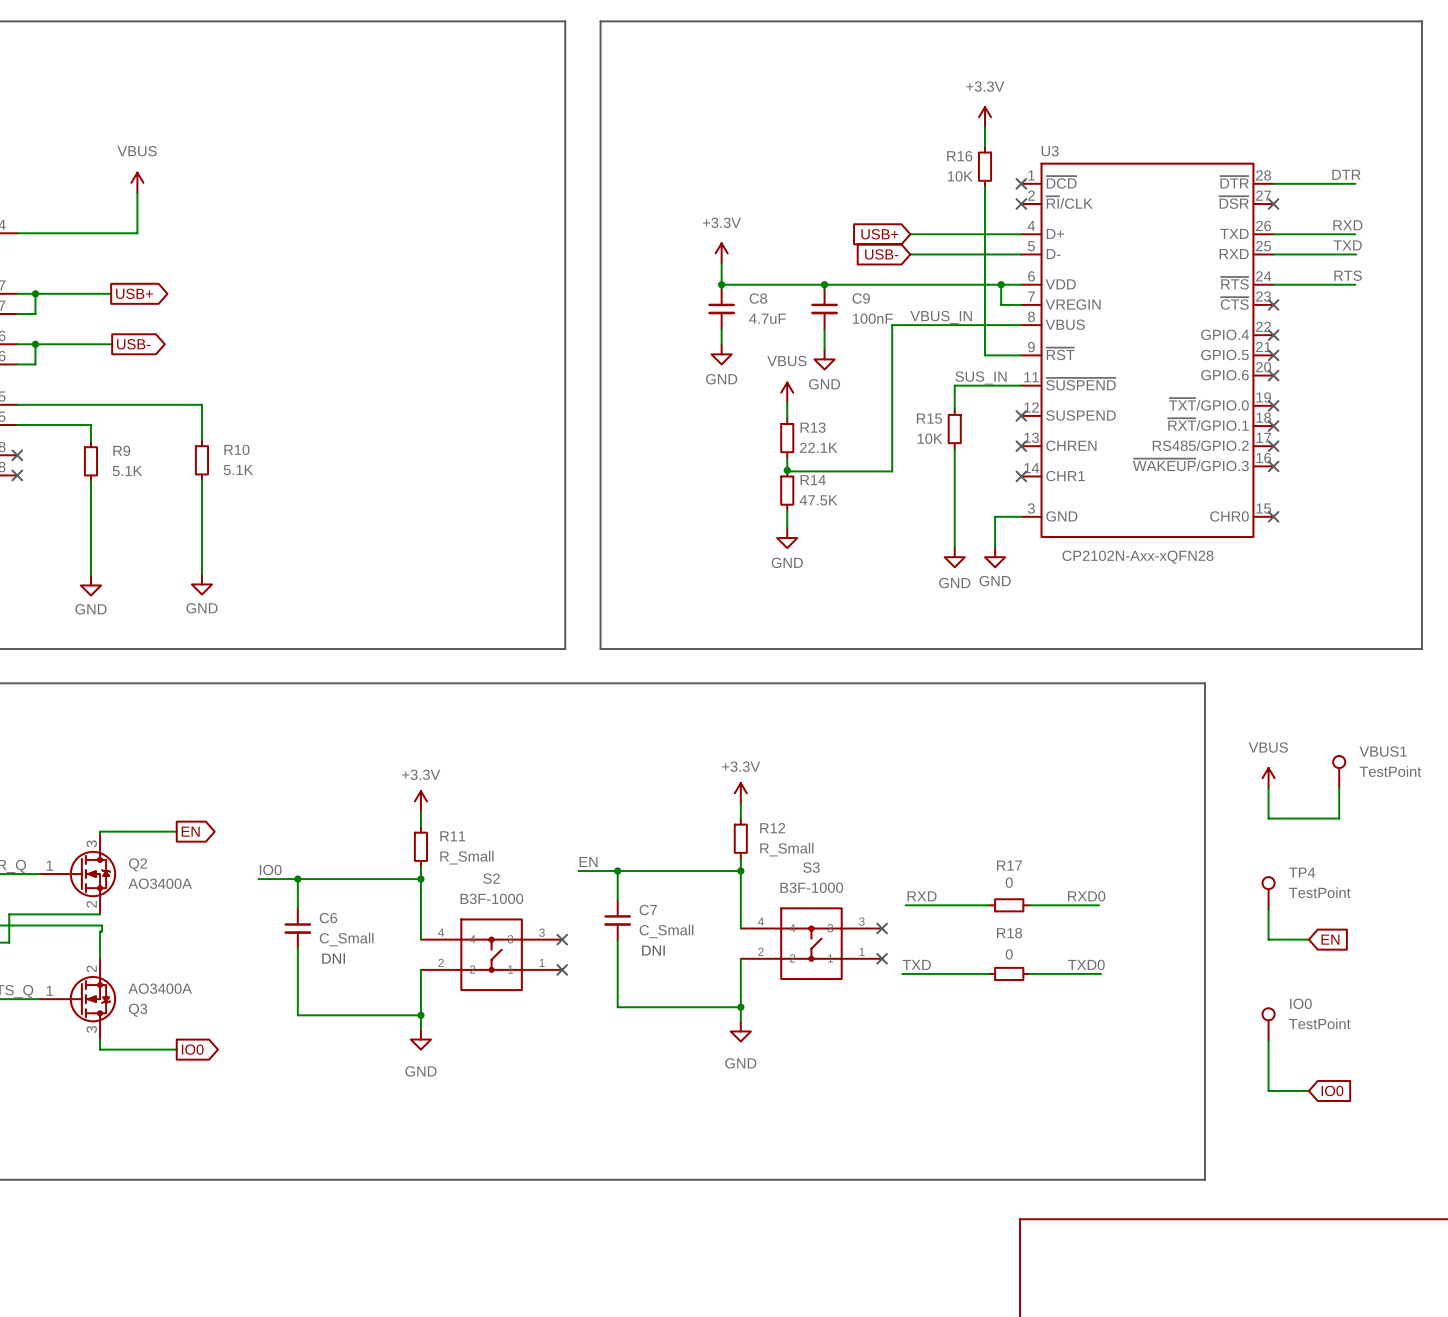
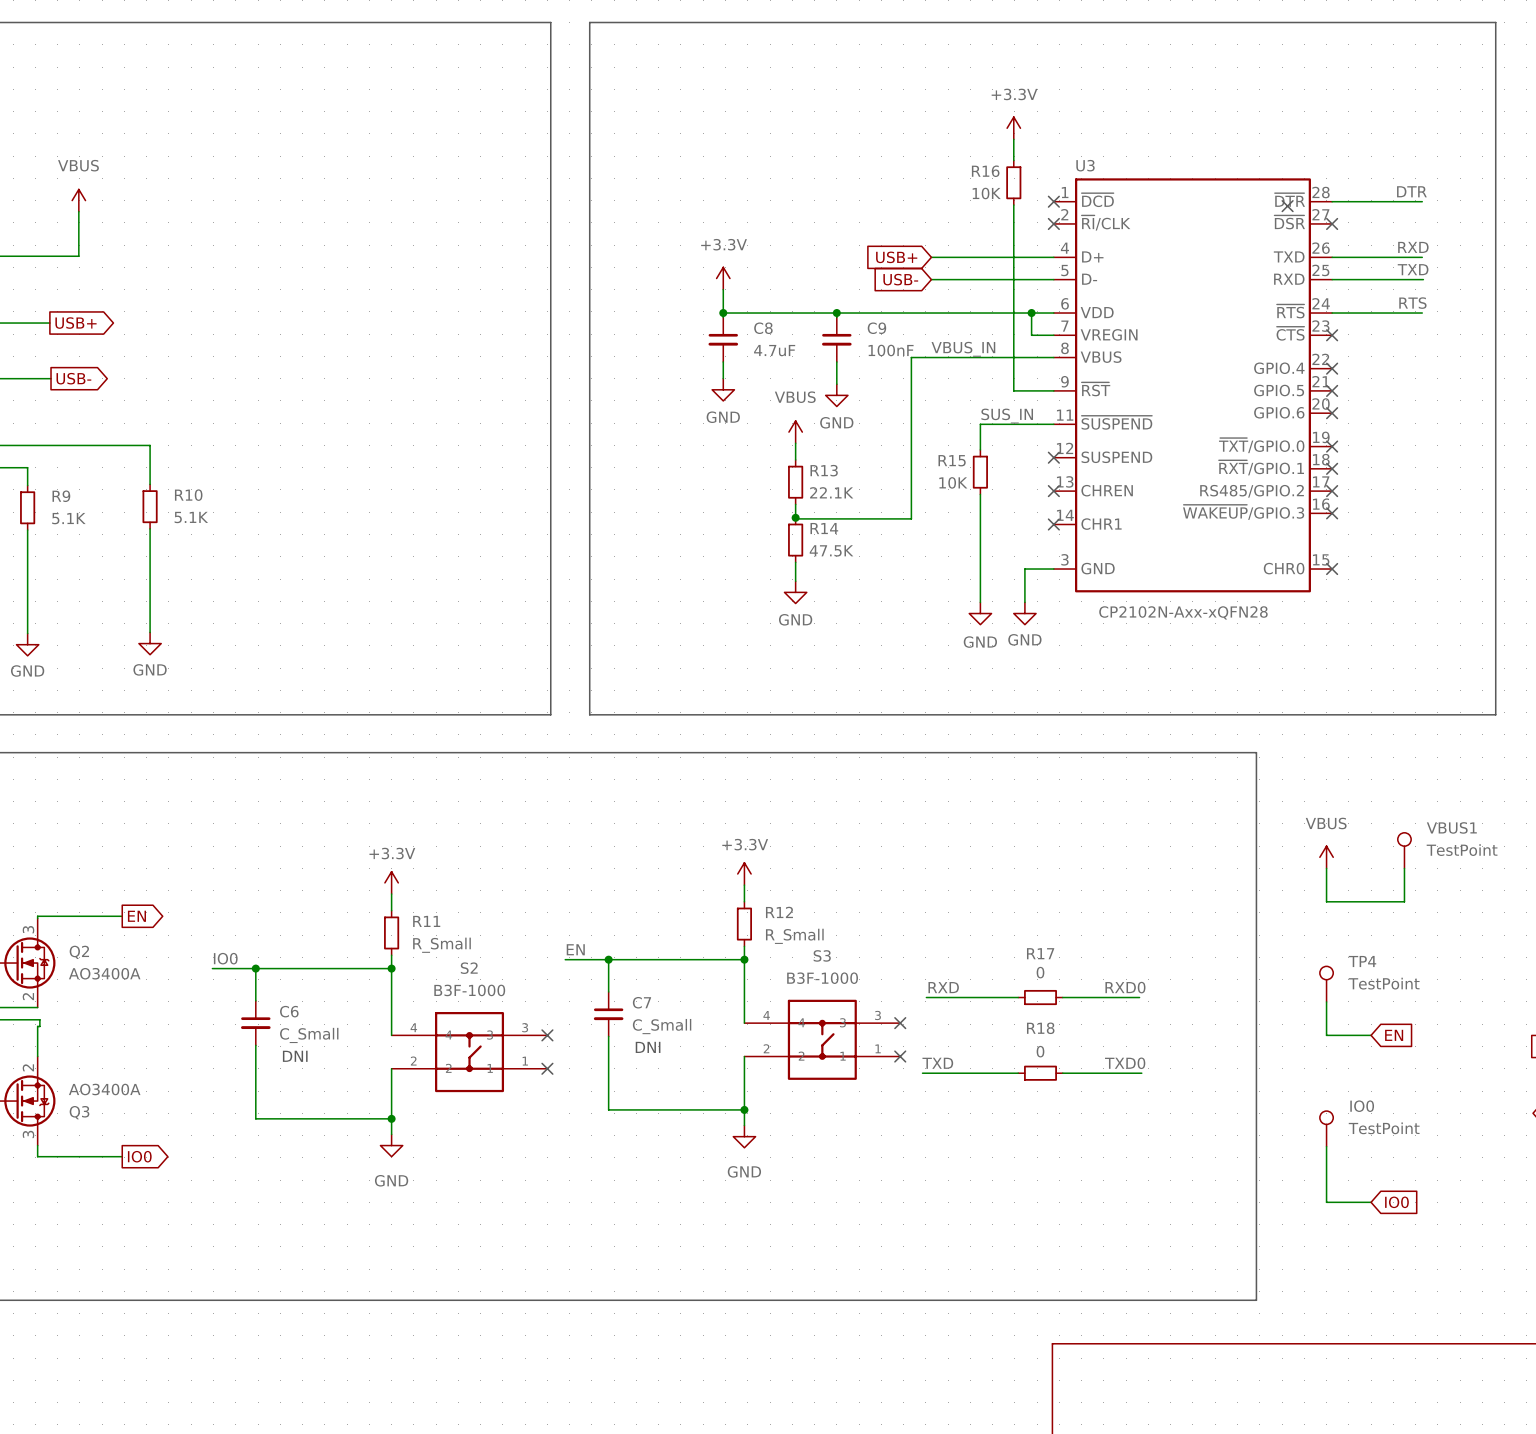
no-connect mark: none -> (1287, 206)

